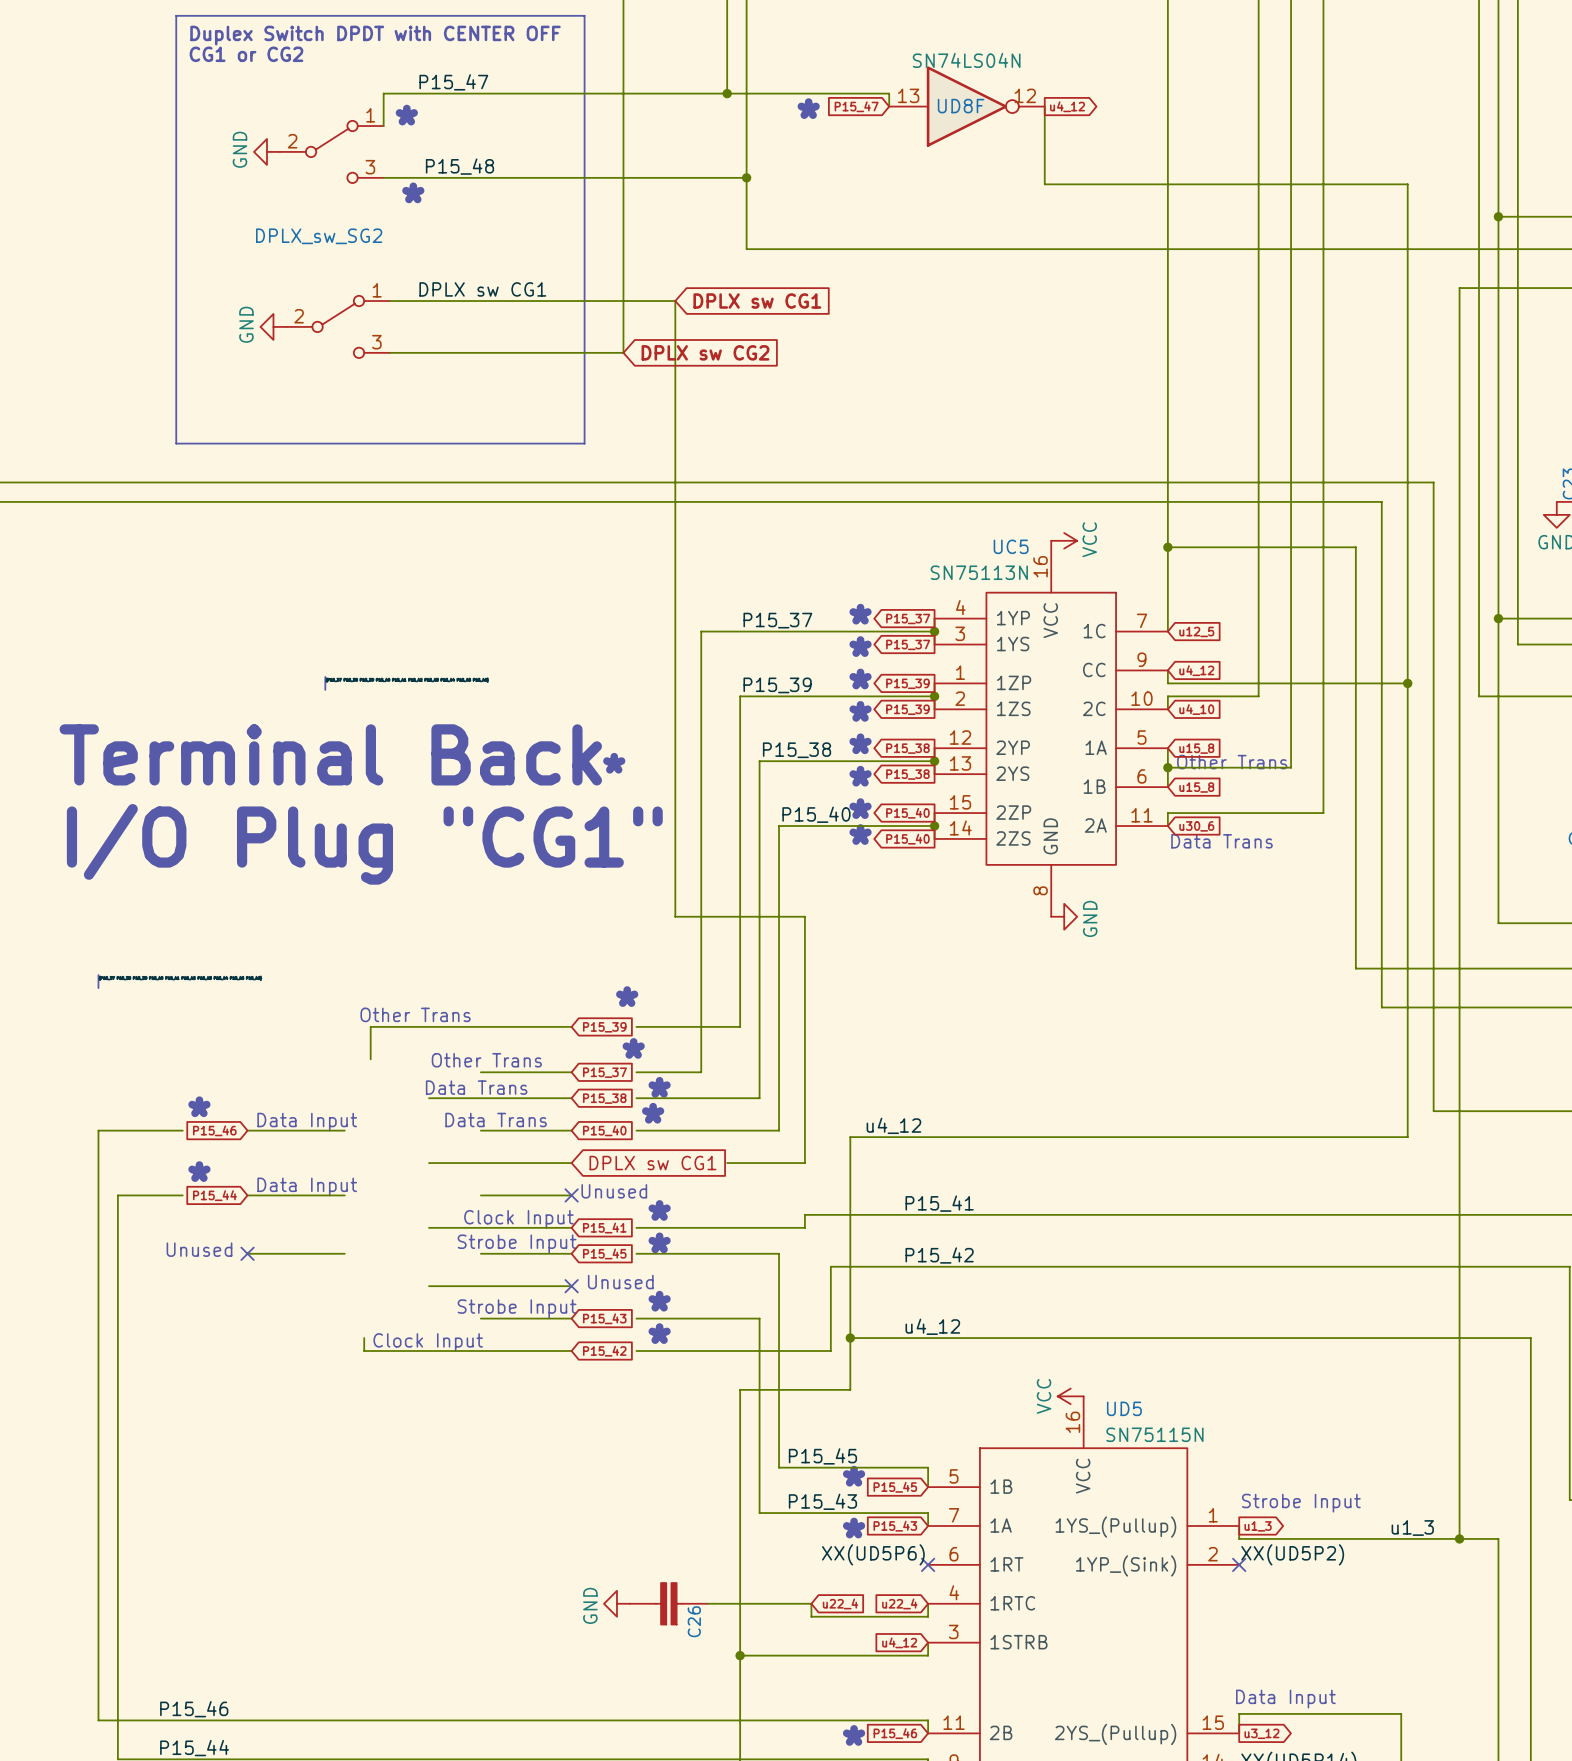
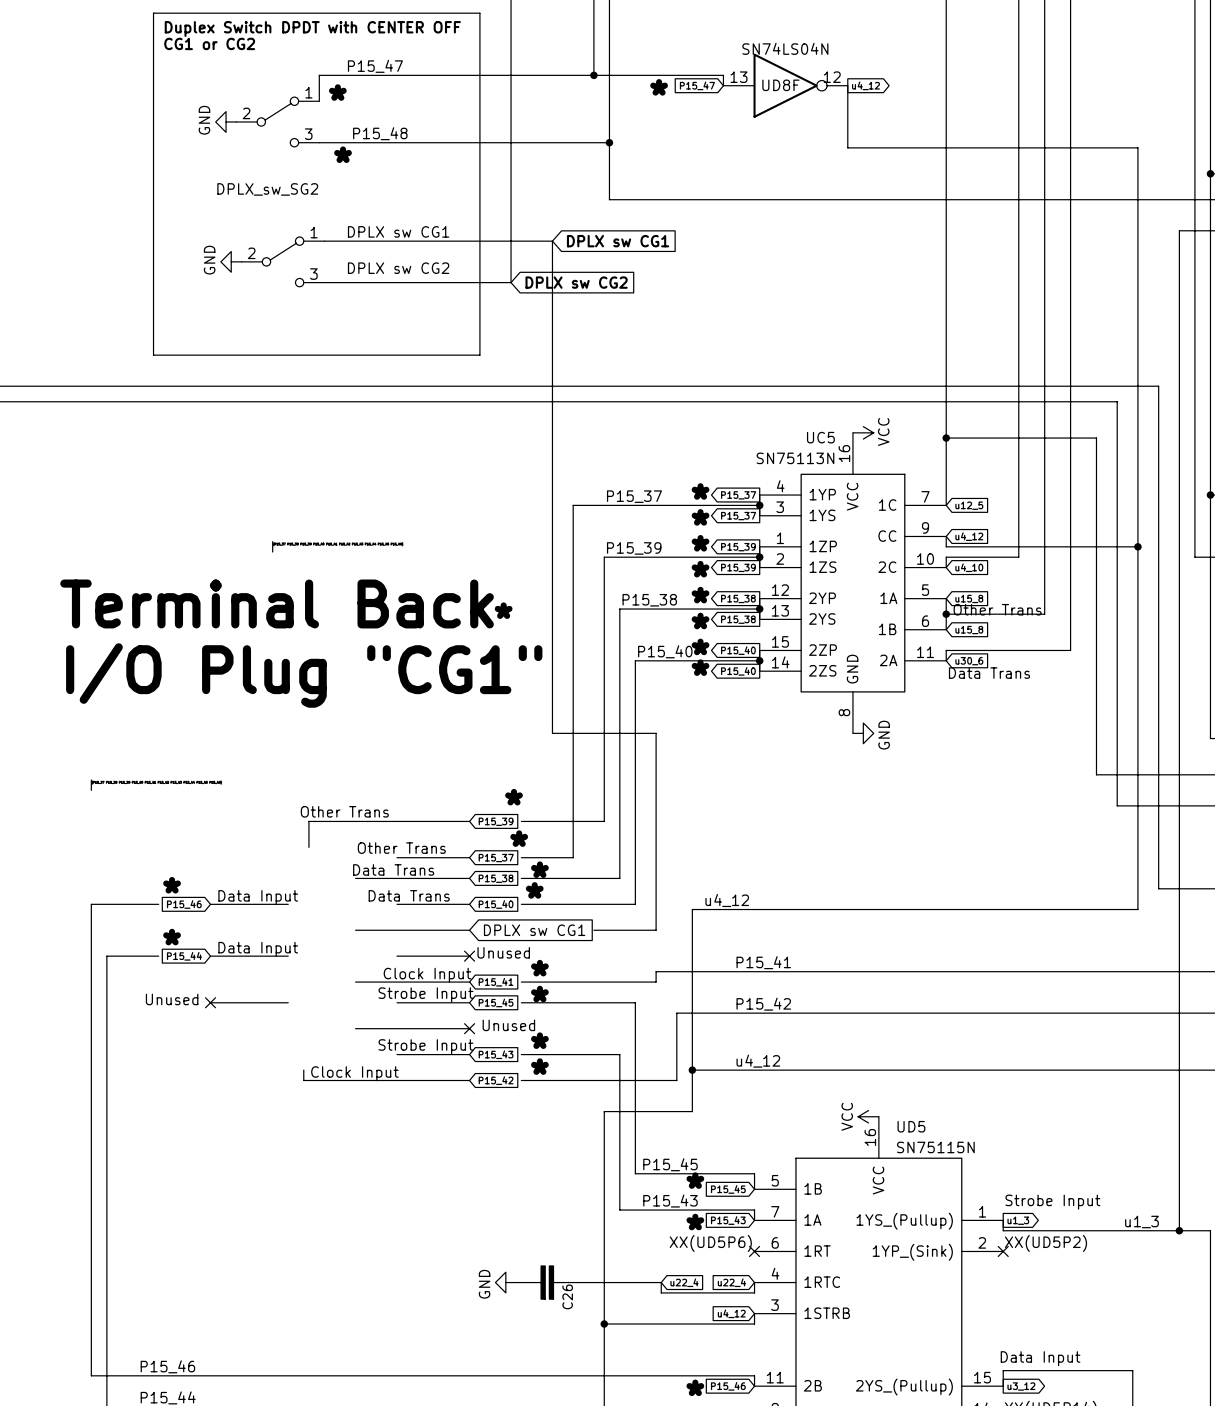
label: none -> DPLX sw CG2 (398, 268)

